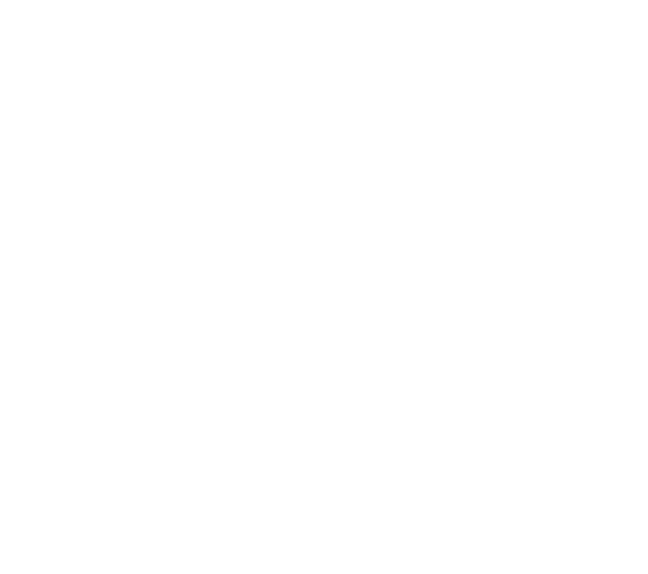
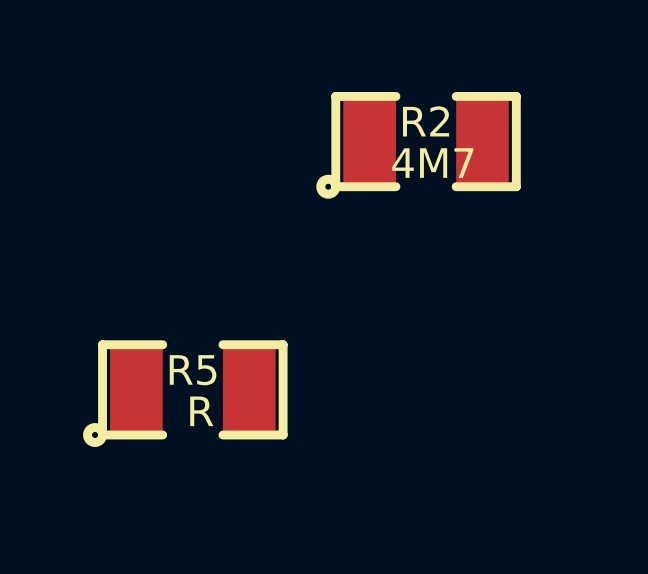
R2: none -> 4M7 (418, 145)
R5: none -> R (185, 393)

